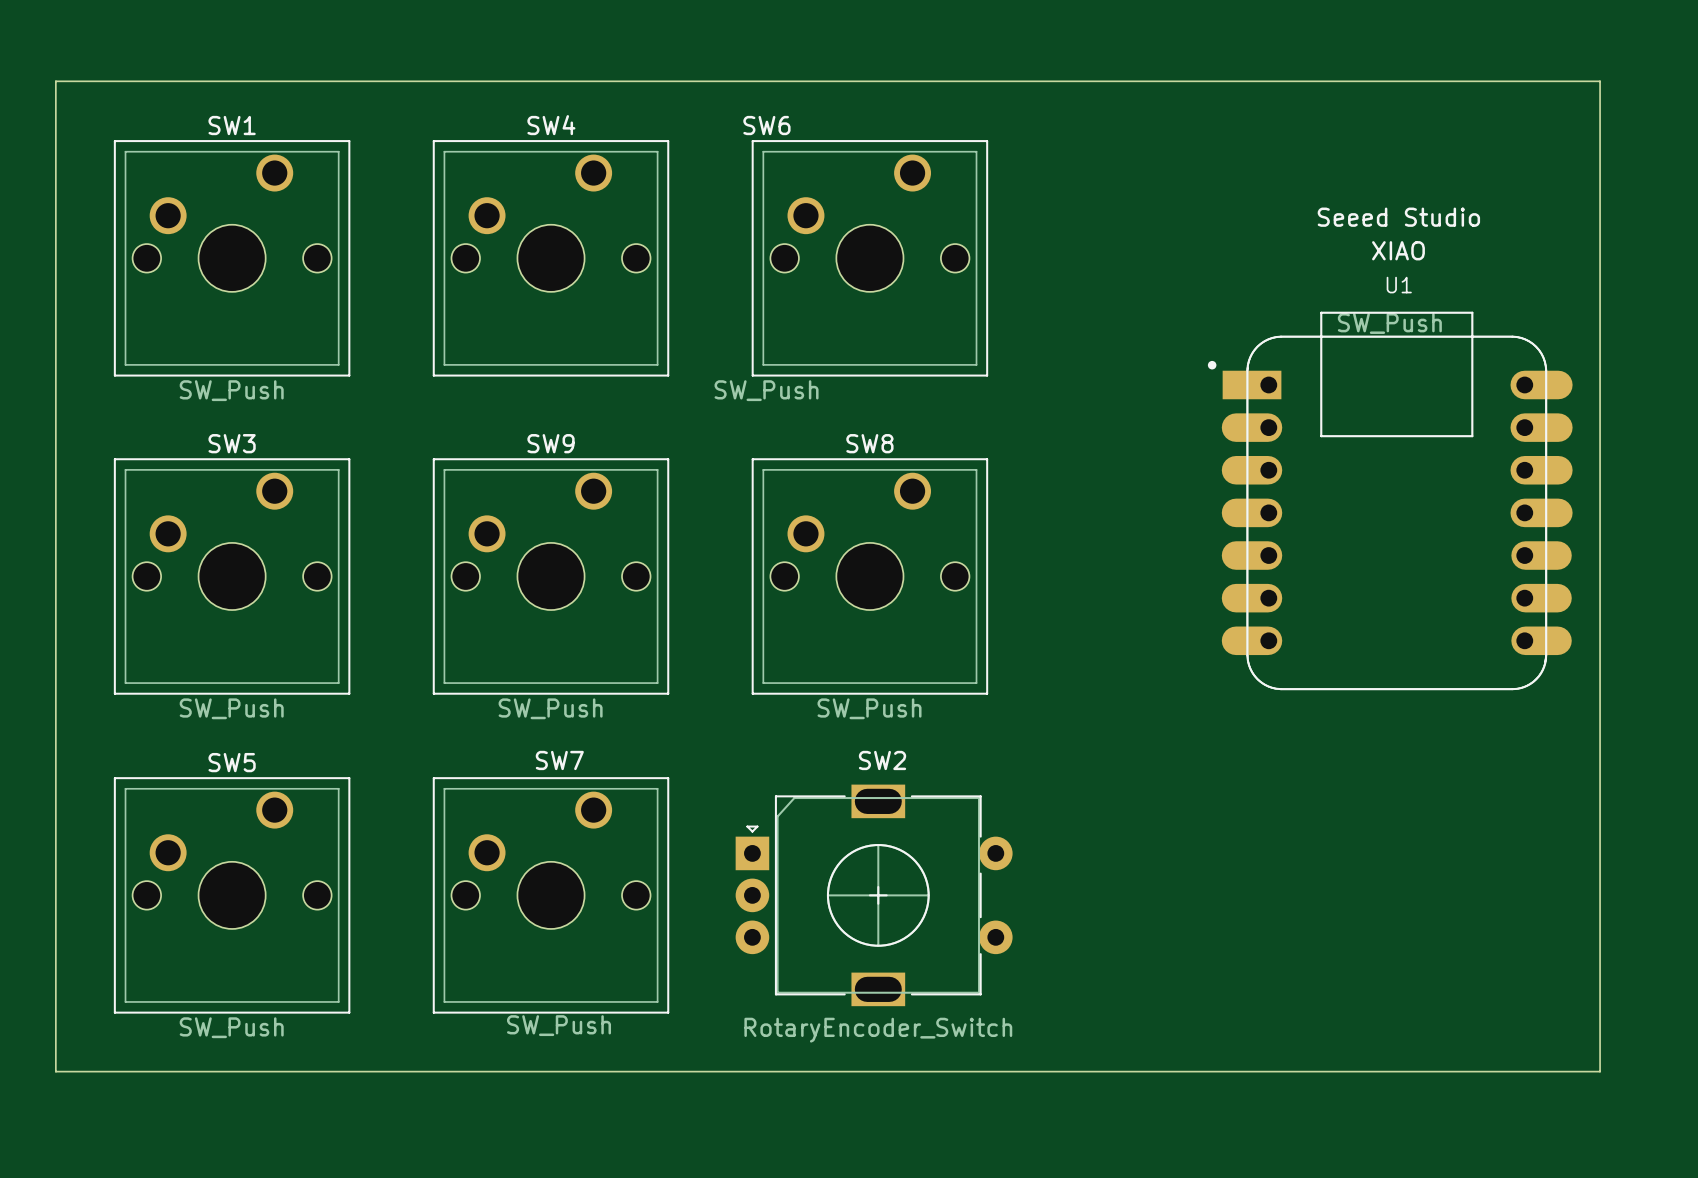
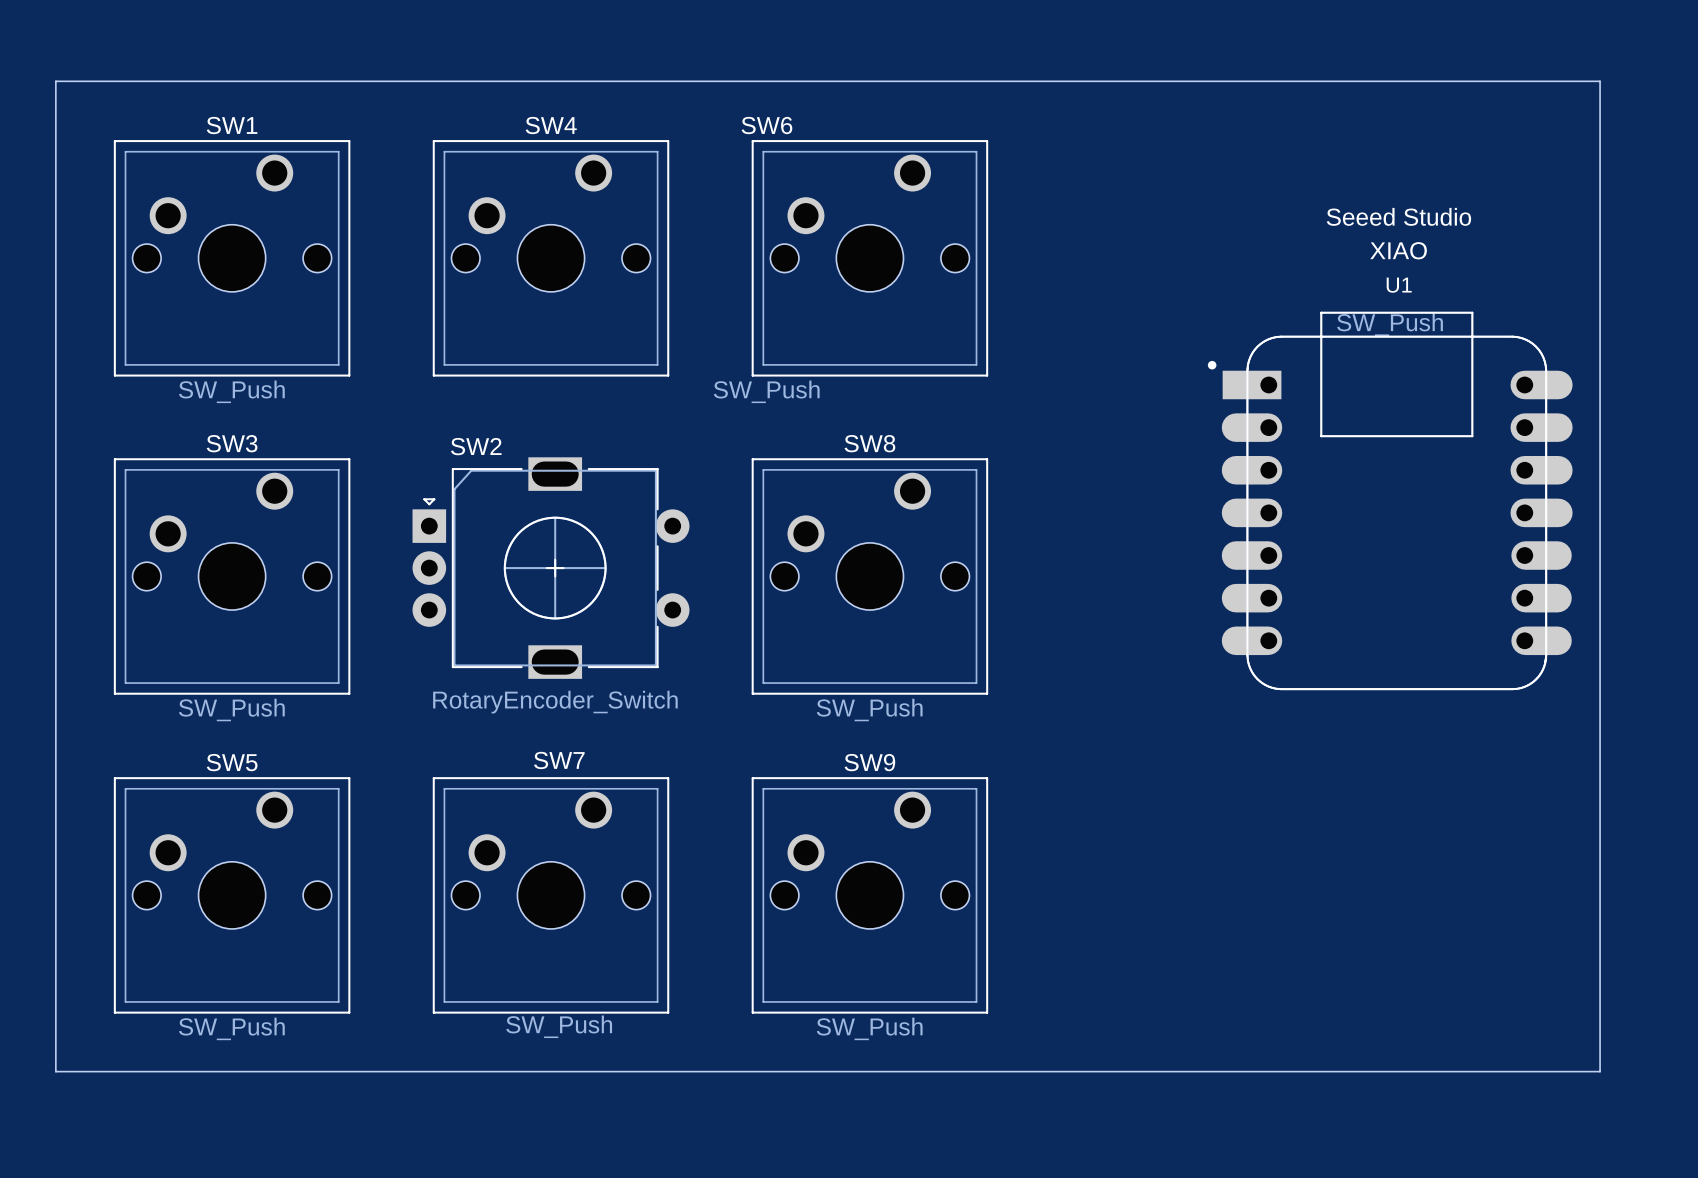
SW9 position: (551, 576) -> (869, 895)
SW2 name position: SW2 (882, 760) -> SW2 (476, 446)
SW2 position: (874, 895) -> (551, 568)

